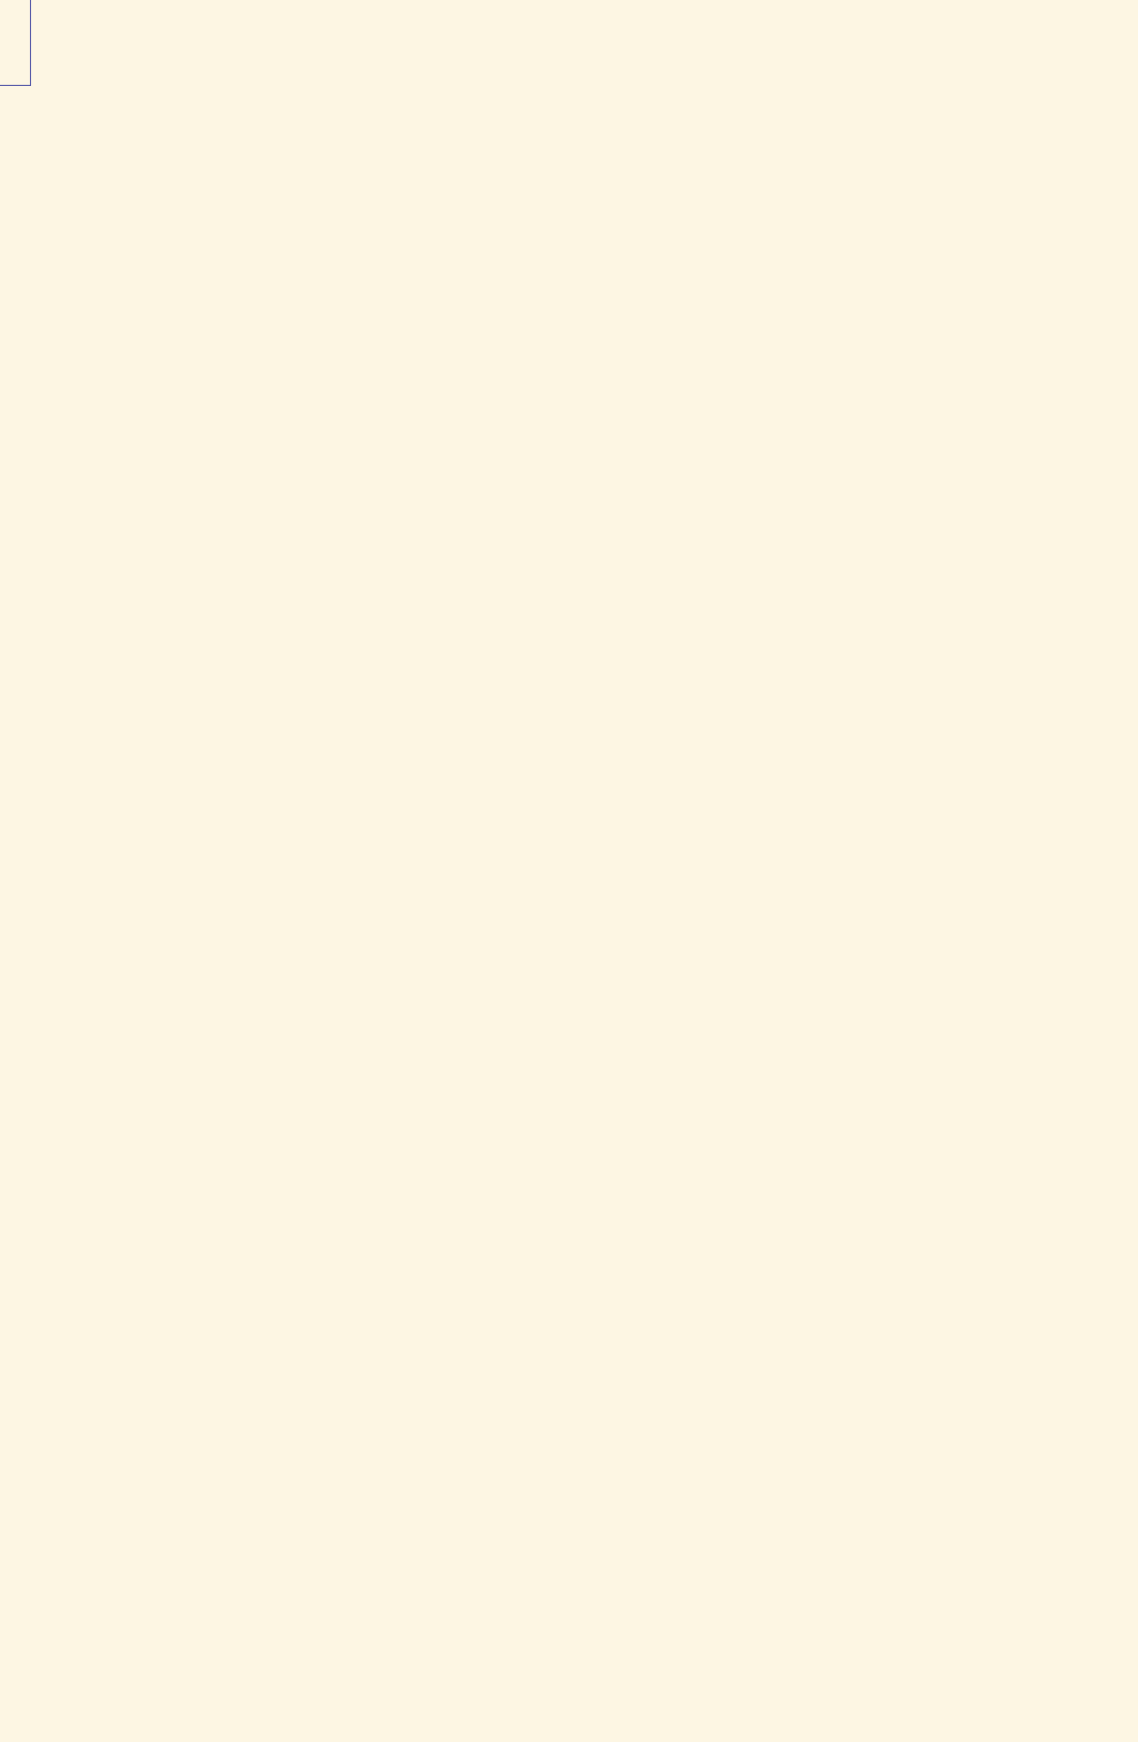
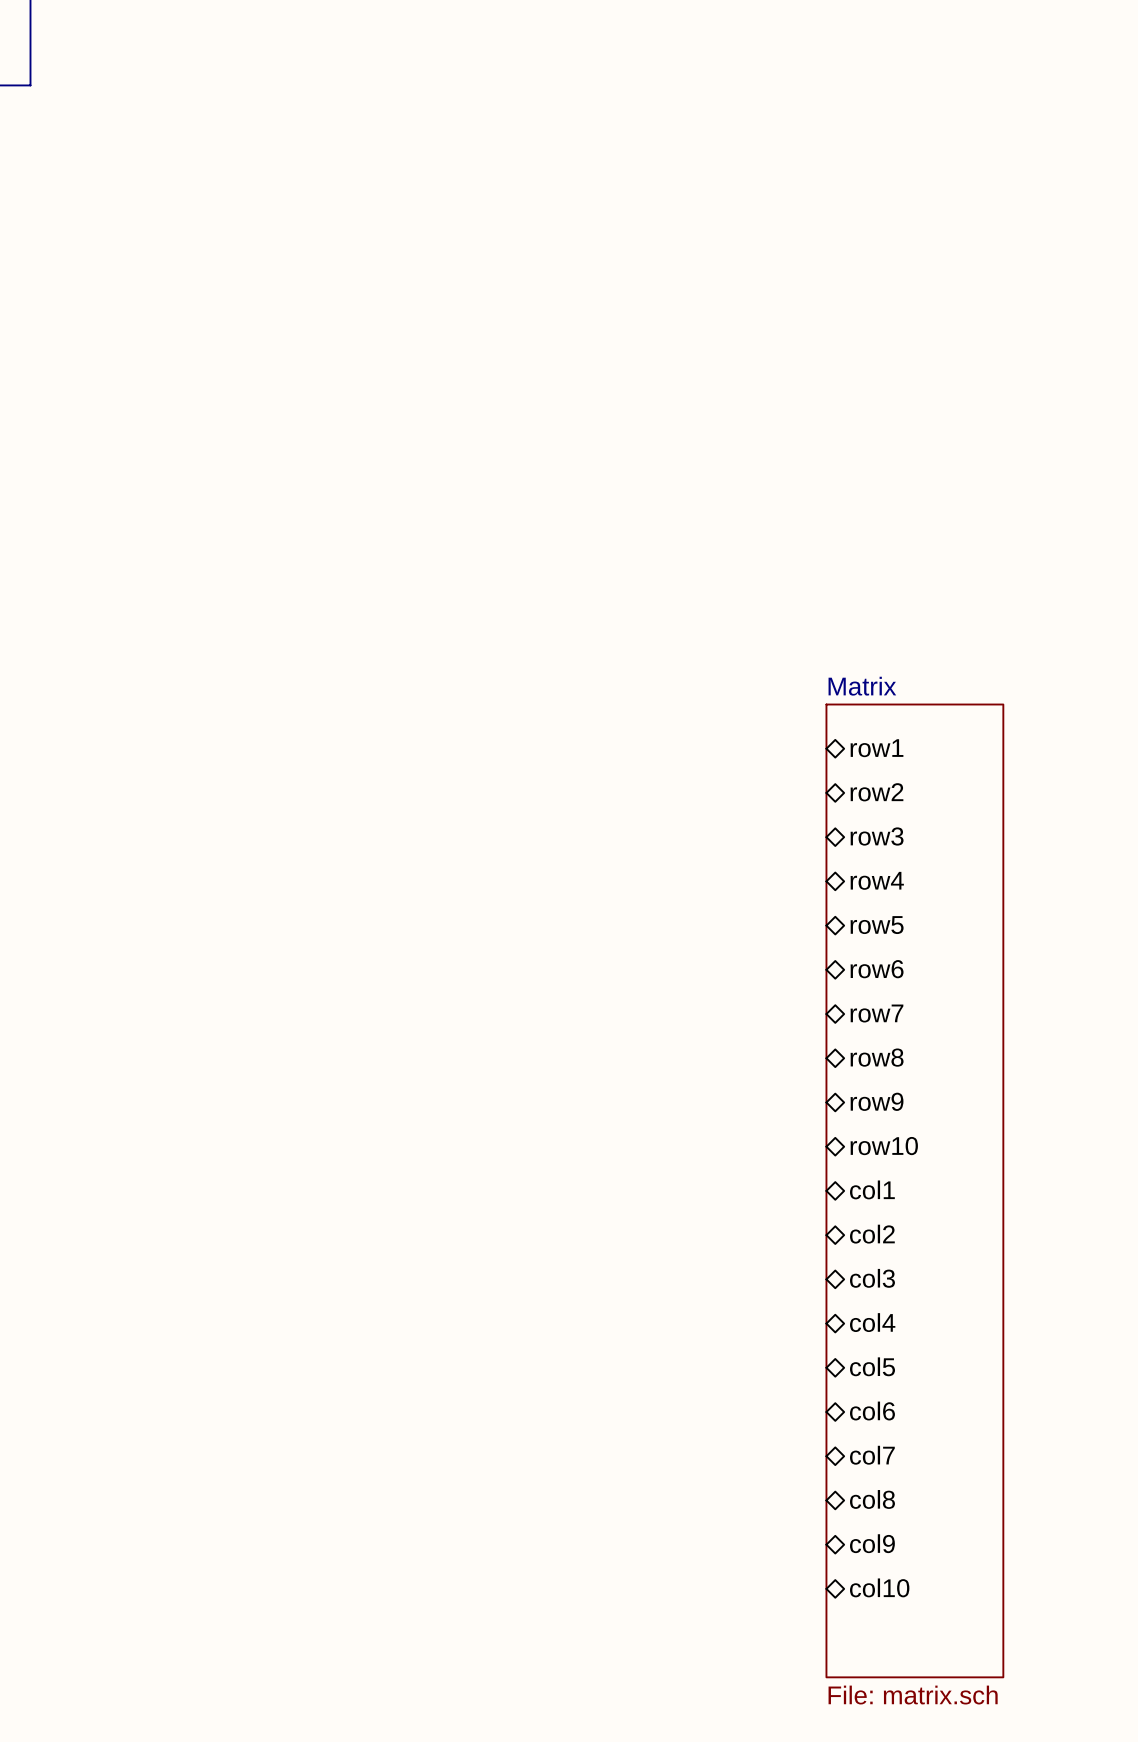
sheet pin: none -> row1 (877, 748)
sheet pin: none -> row2 (876, 792)
sheet pin: none -> row3 (877, 836)
sheet pin: none -> row4 (877, 880)
sheet pin: none -> row5 (877, 925)
sheet pin: none -> row6 (877, 969)
sheet pin: none -> row7 (876, 1013)
sheet pin: none -> row8 (877, 1057)
sheet pin: none -> row9 (877, 1101)
sheet pin: none -> row10 (884, 1146)
sheet pin: none -> col1 (872, 1189)
sheet Matrix: none -> File: matrix.sch (914, 1190)
sheet pin: none -> col2 (872, 1234)
sheet pin: none -> col3 (872, 1278)
sheet pin: none -> col4 (872, 1322)
sheet pin: none -> col5 (872, 1366)
sheet pin: none -> col6 (872, 1411)
sheet pin: none -> col7 (872, 1455)
sheet pin: none -> col8 (872, 1499)
sheet pin: none -> col9 (872, 1543)
sheet pin: none -> col10 (879, 1587)

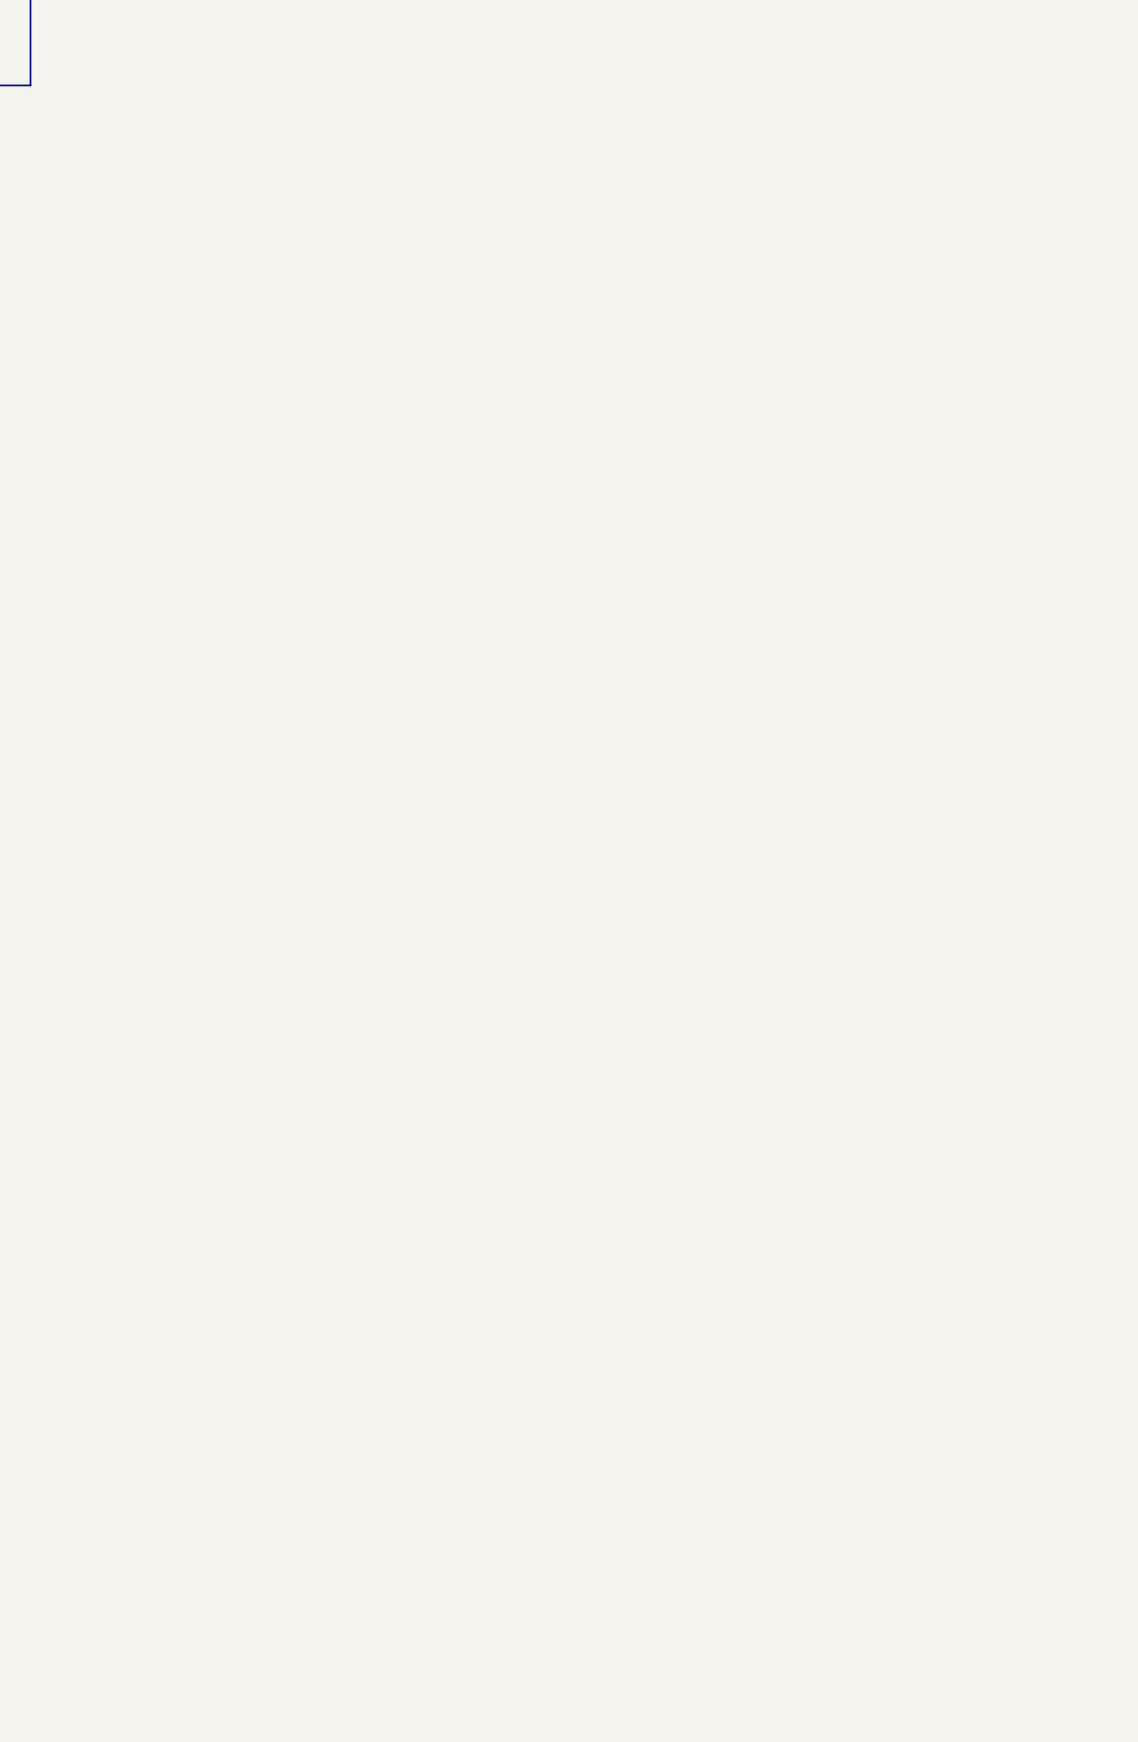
sheet pin: row1 (877, 748) -> none
sheet pin: row2 (876, 792) -> none
sheet pin: row3 (877, 836) -> none
sheet pin: row4 (877, 880) -> none
sheet pin: row5 (877, 925) -> none
sheet pin: row6 (877, 969) -> none
sheet pin: row7 (876, 1013) -> none
sheet pin: row8 (877, 1057) -> none
sheet pin: row9 (877, 1101) -> none
sheet pin: row10 (884, 1146) -> none
sheet pin: col1 (872, 1189) -> none
sheet Matrix: File: matrix.sch (914, 1190) -> none
sheet pin: col2 (872, 1234) -> none
sheet pin: col3 (872, 1278) -> none
sheet pin: col4 (872, 1322) -> none
sheet pin: col5 (872, 1366) -> none
sheet pin: col6 (872, 1411) -> none
sheet pin: col7 (872, 1455) -> none
sheet pin: col8 (872, 1499) -> none
sheet pin: col9 (872, 1543) -> none
sheet pin: col10 (879, 1587) -> none

